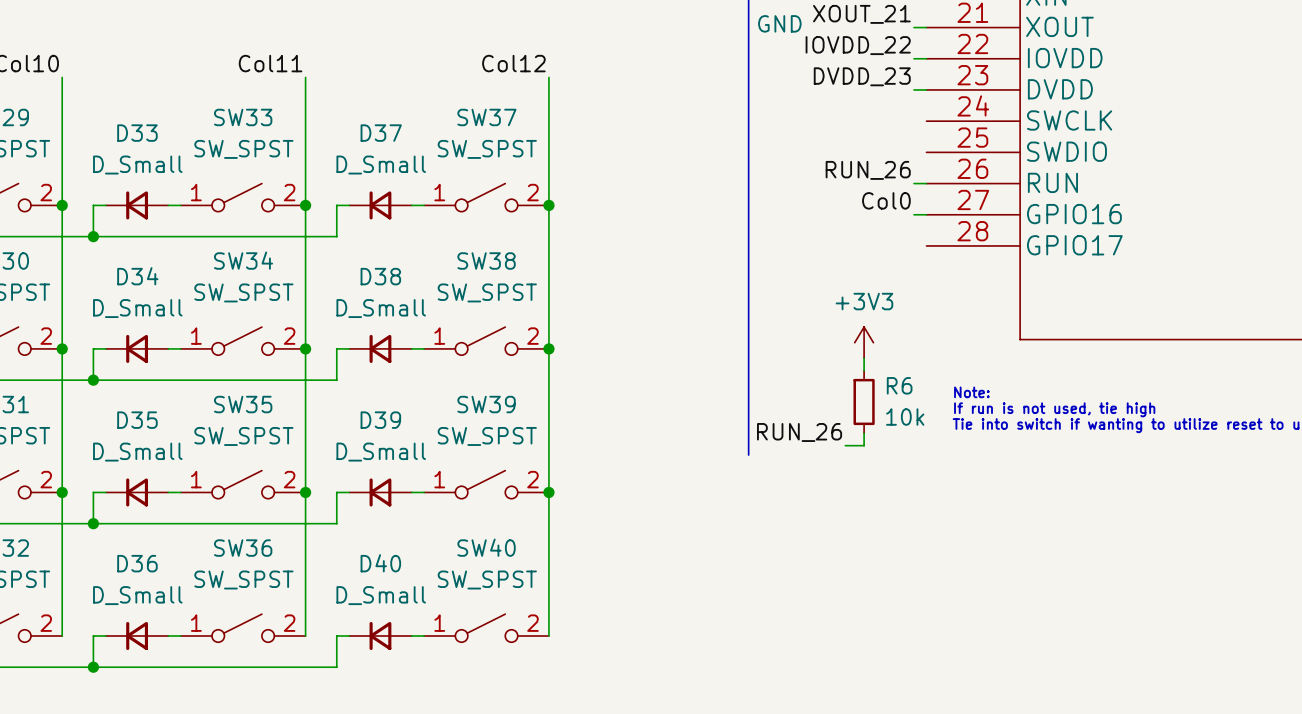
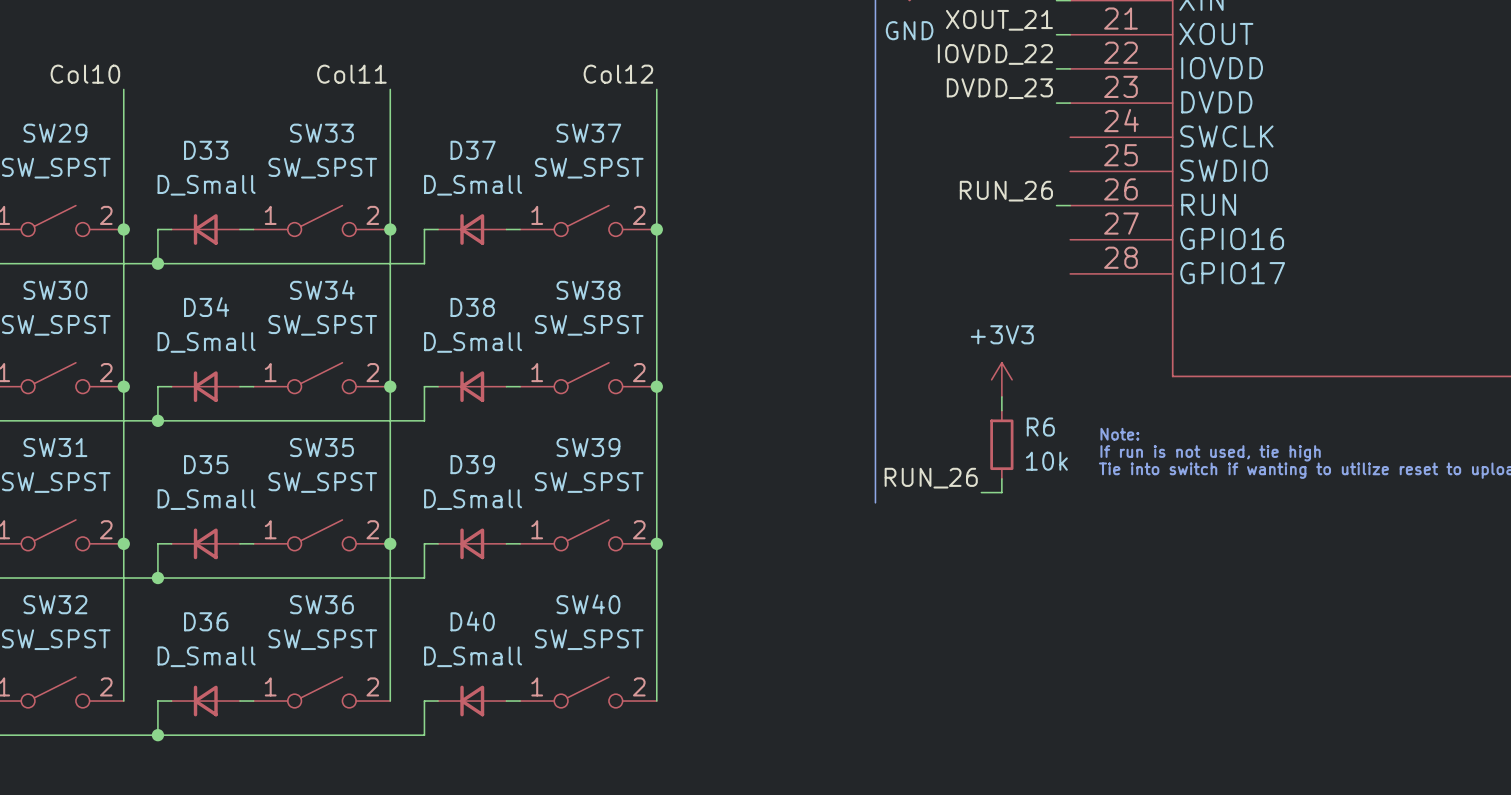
label: Col0 (886, 200) -> none
wire: (914, 214) (926, 214) -> none

